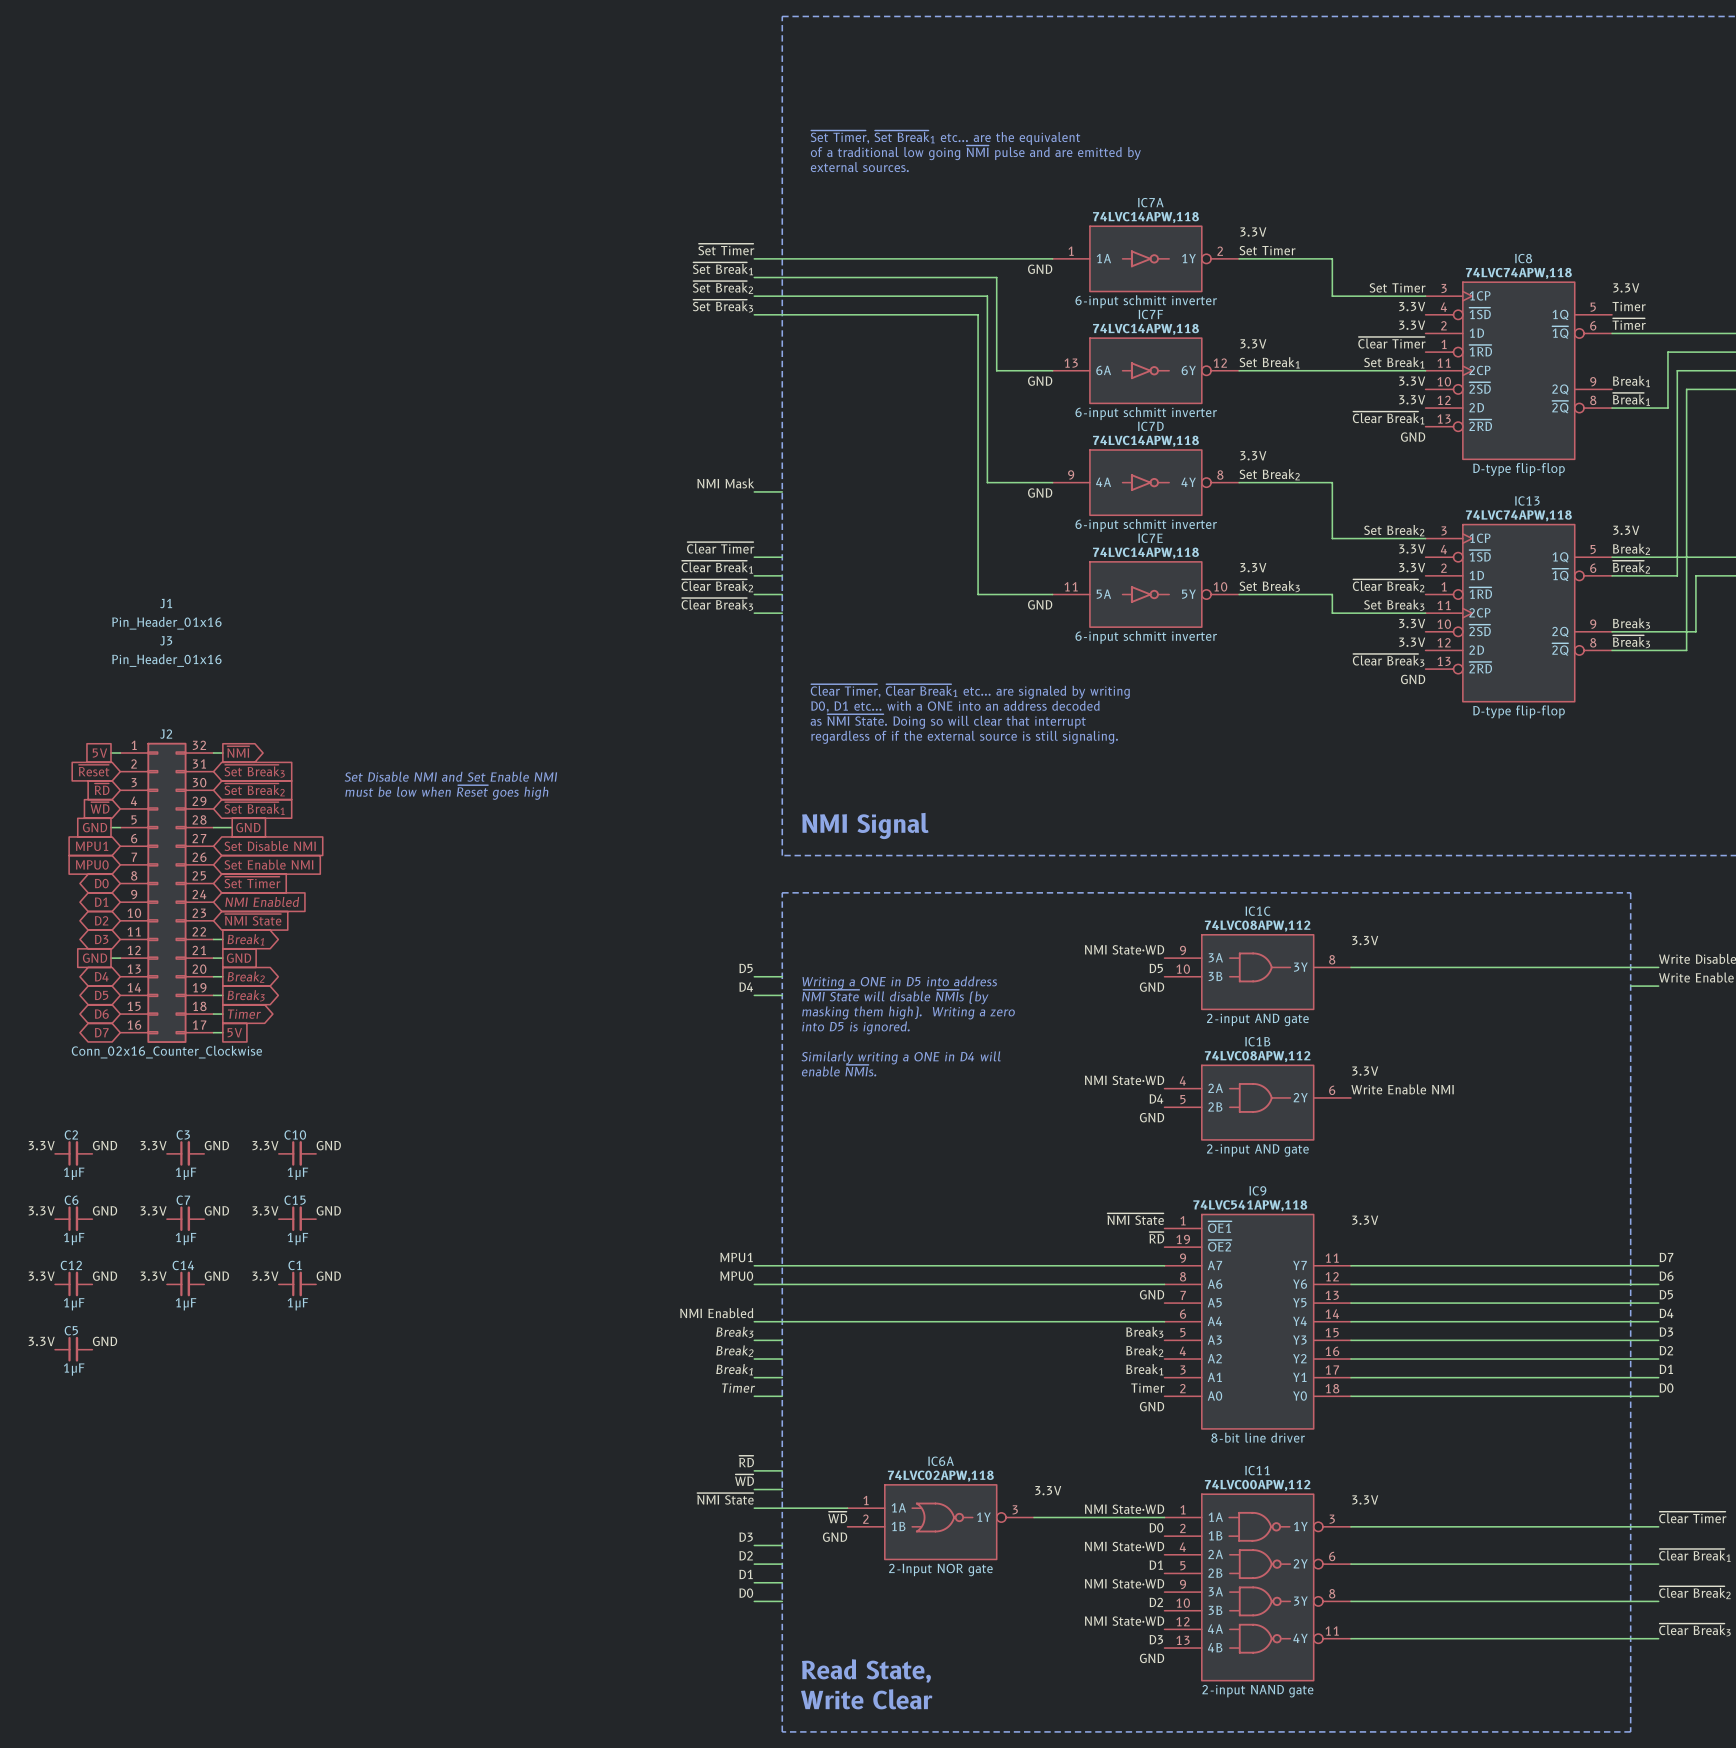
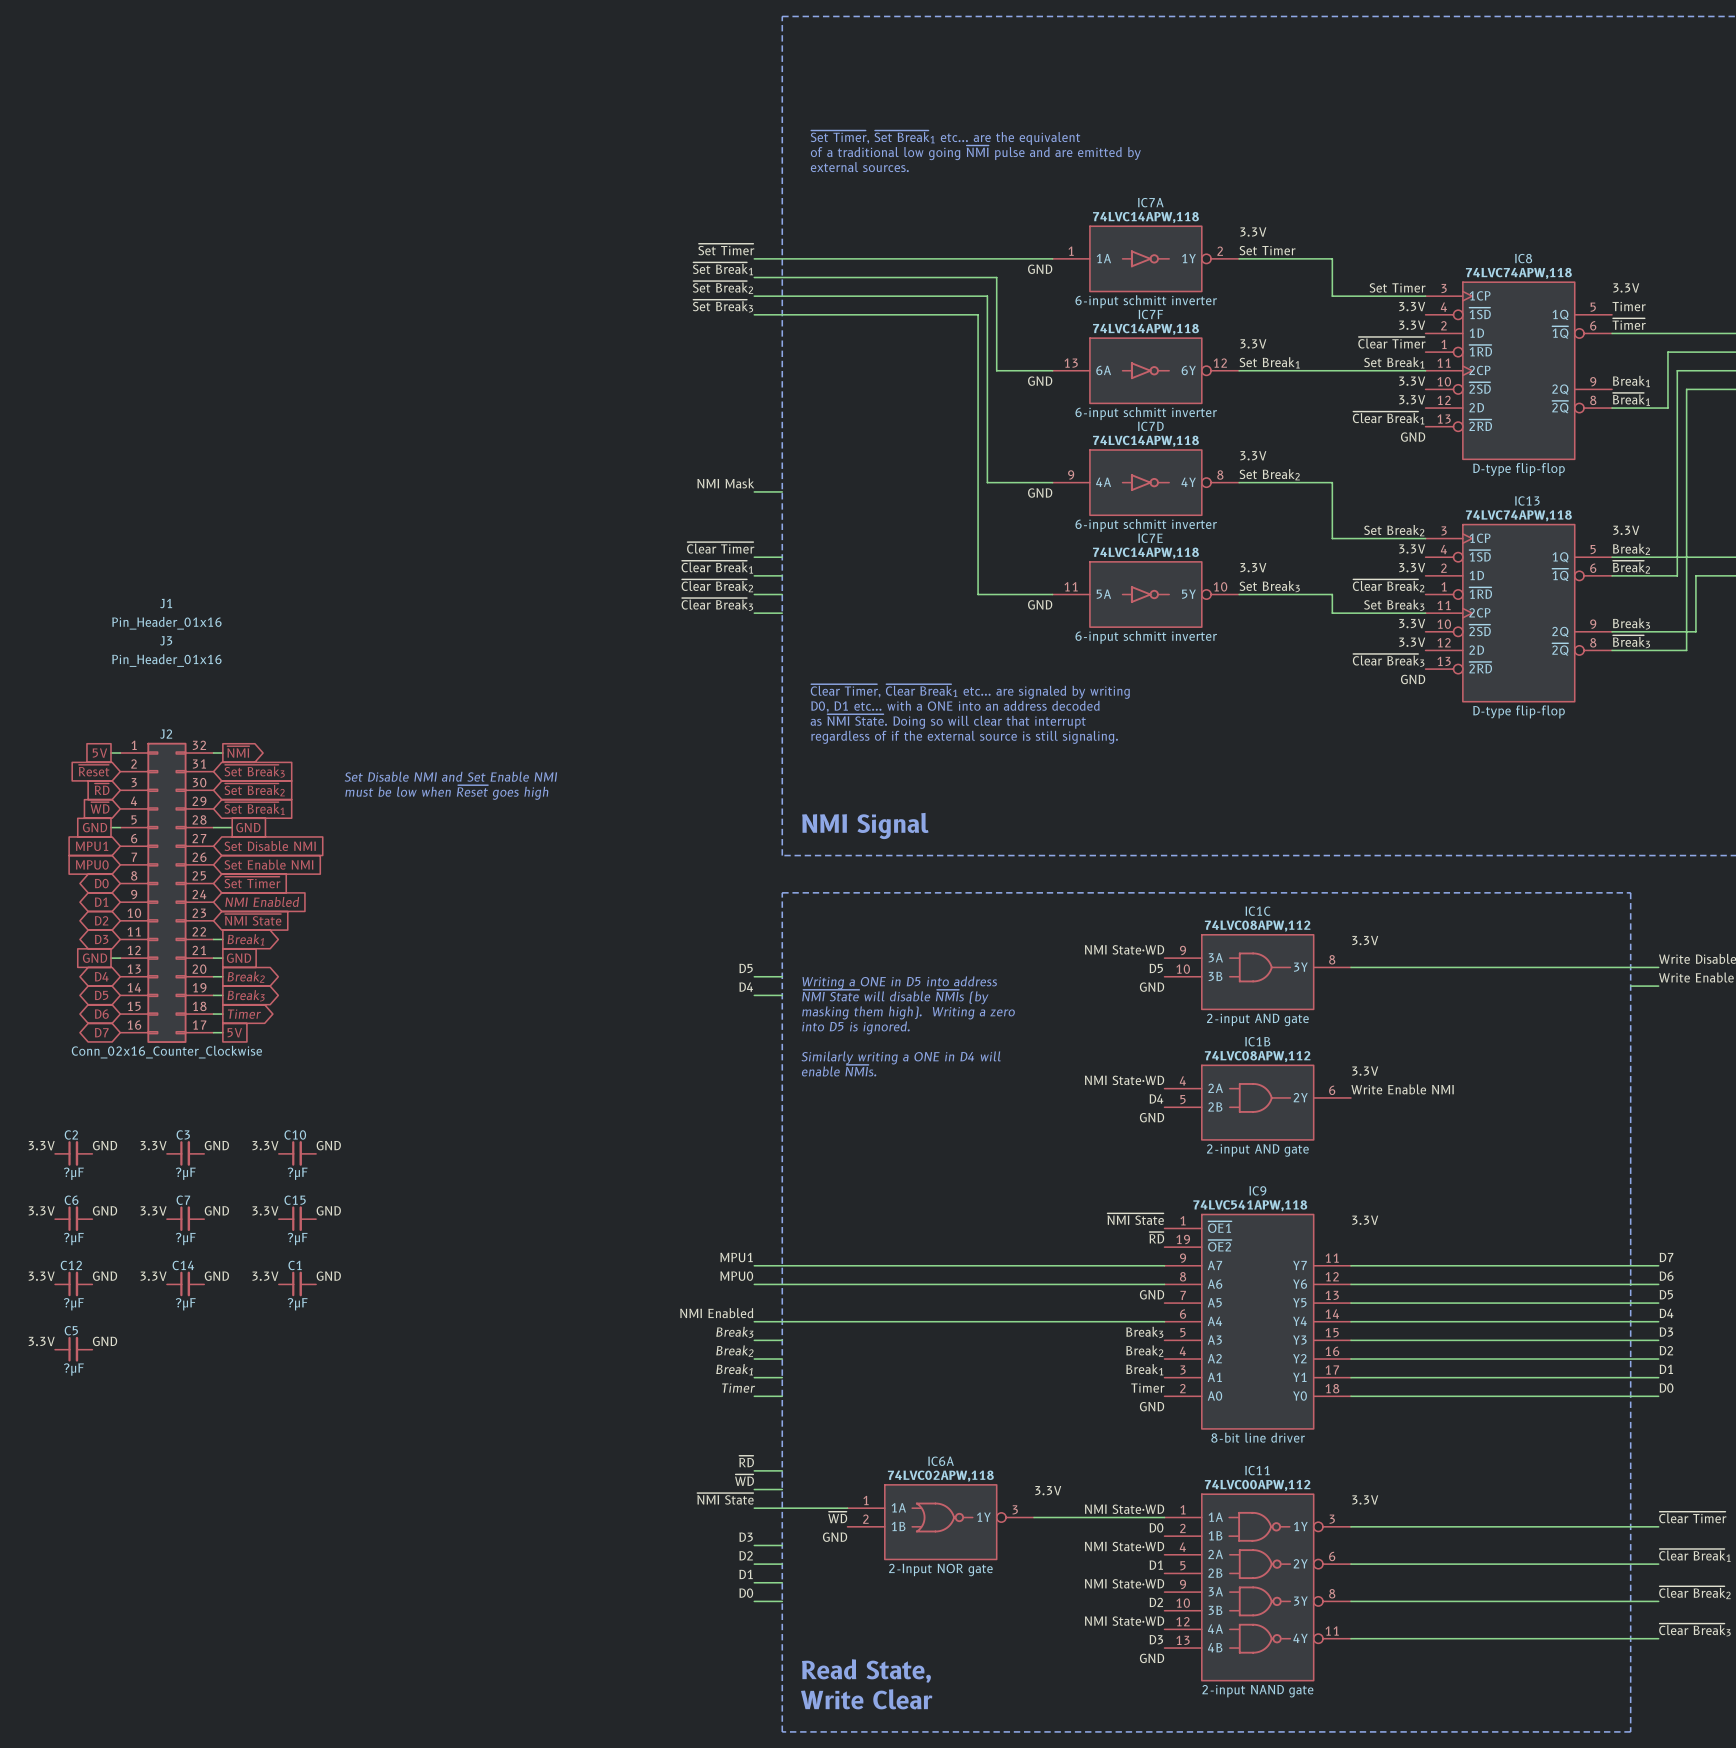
C2 value: 1μF (74, 1173) -> ?μF (73, 1173)
C3 value: 1μF (186, 1173) -> ?μF (185, 1173)
C10 value: 1μF (297, 1173) -> ?μF (297, 1173)
C6 value: 1μF (74, 1238) -> ?μF (73, 1239)
C7 value: 1μF (186, 1238) -> ?μF (185, 1239)
C15 value: 1μF (297, 1238) -> ?μF (297, 1239)
C12 value: 1μF (74, 1304) -> ?μF (73, 1304)
C14 value: 1μF (186, 1304) -> ?μF (185, 1304)
C1 value: 1μF (297, 1304) -> ?μF (297, 1304)
C5 value: 1μF (74, 1369) -> ?μF (73, 1369)

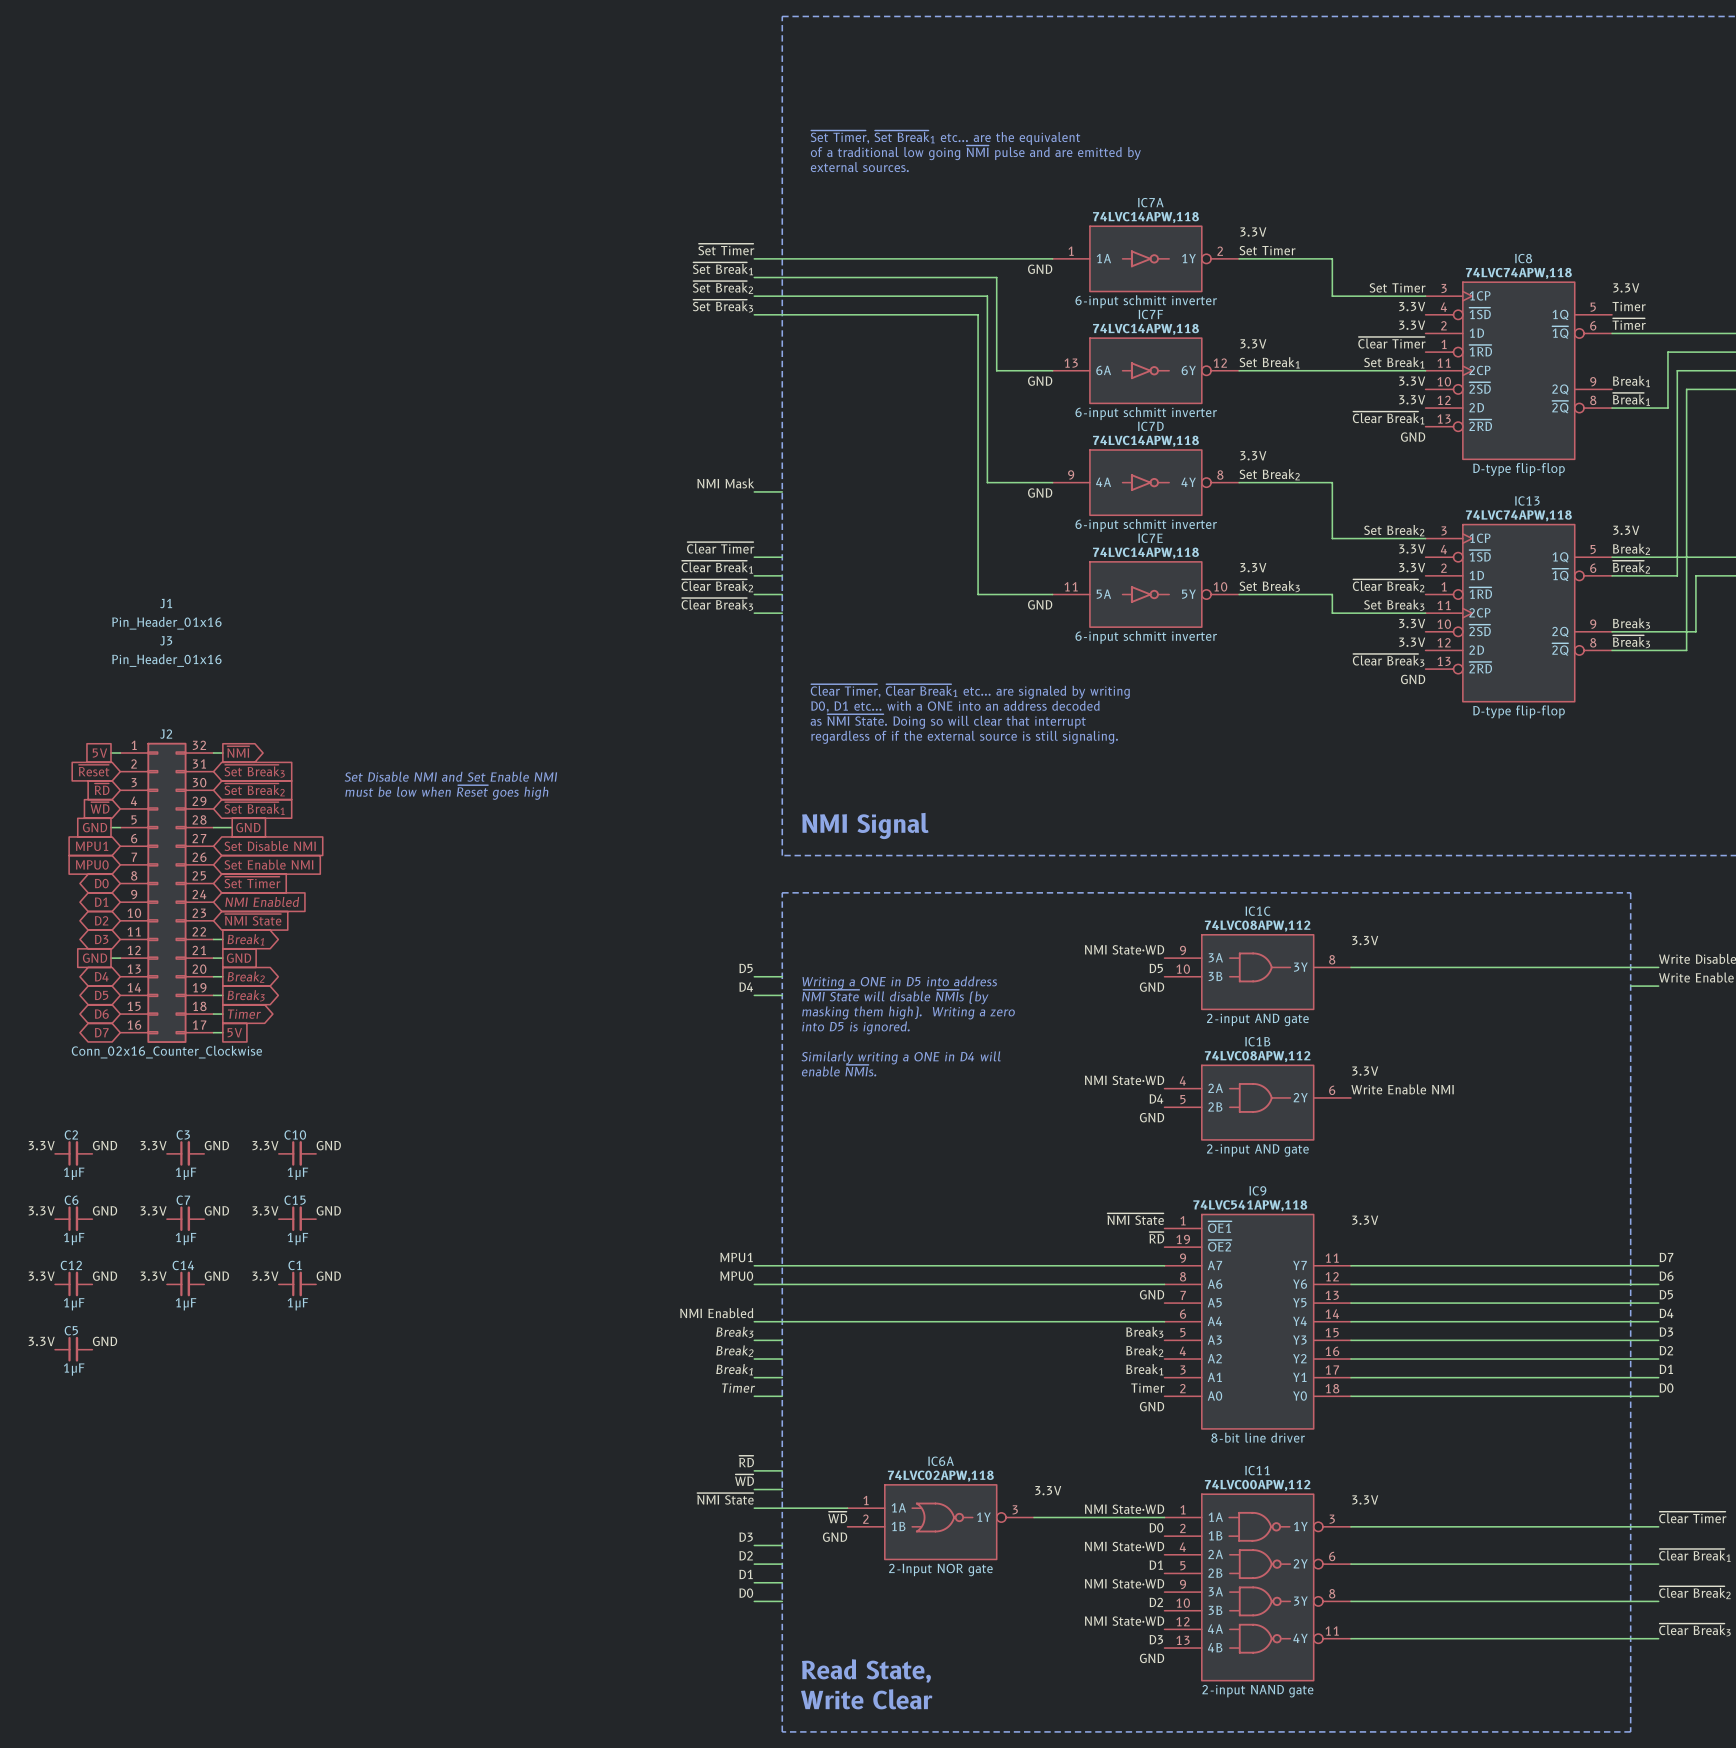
C2 value: ?μF (73, 1173) -> 1μF (74, 1173)
C3 value: ?μF (185, 1173) -> 1μF (186, 1173)
C10 value: ?μF (297, 1173) -> 1μF (297, 1173)
C6 value: ?μF (73, 1239) -> 1μF (74, 1238)
C7 value: ?μF (185, 1239) -> 1μF (186, 1238)
C15 value: ?μF (297, 1239) -> 1μF (297, 1238)
C12 value: ?μF (73, 1304) -> 1μF (74, 1304)
C14 value: ?μF (185, 1304) -> 1μF (186, 1304)
C1 value: ?μF (297, 1304) -> 1μF (297, 1304)
C5 value: ?μF (73, 1369) -> 1μF (74, 1369)

